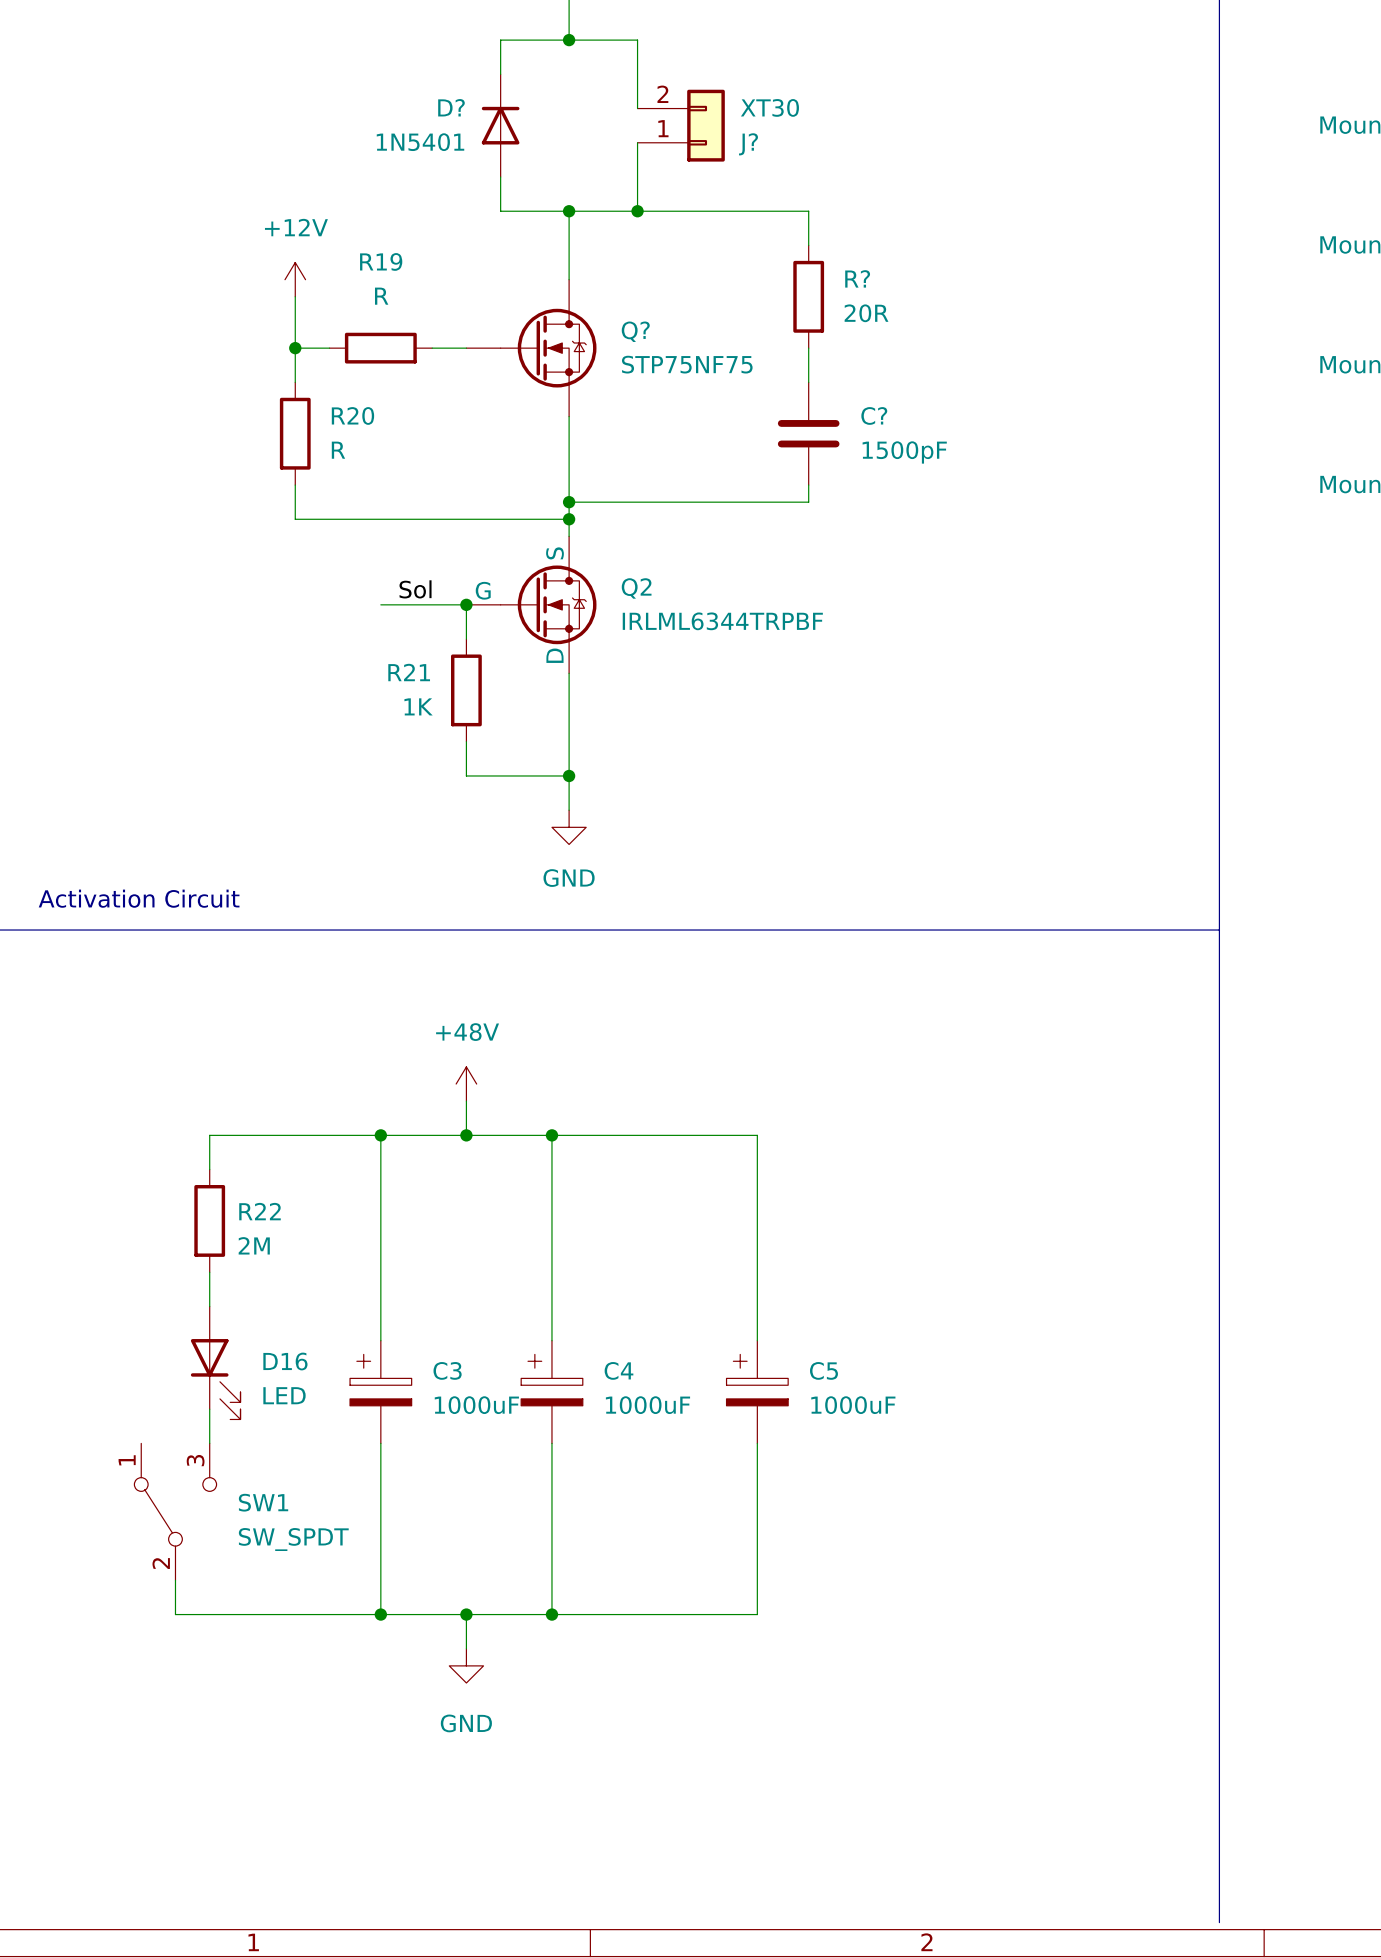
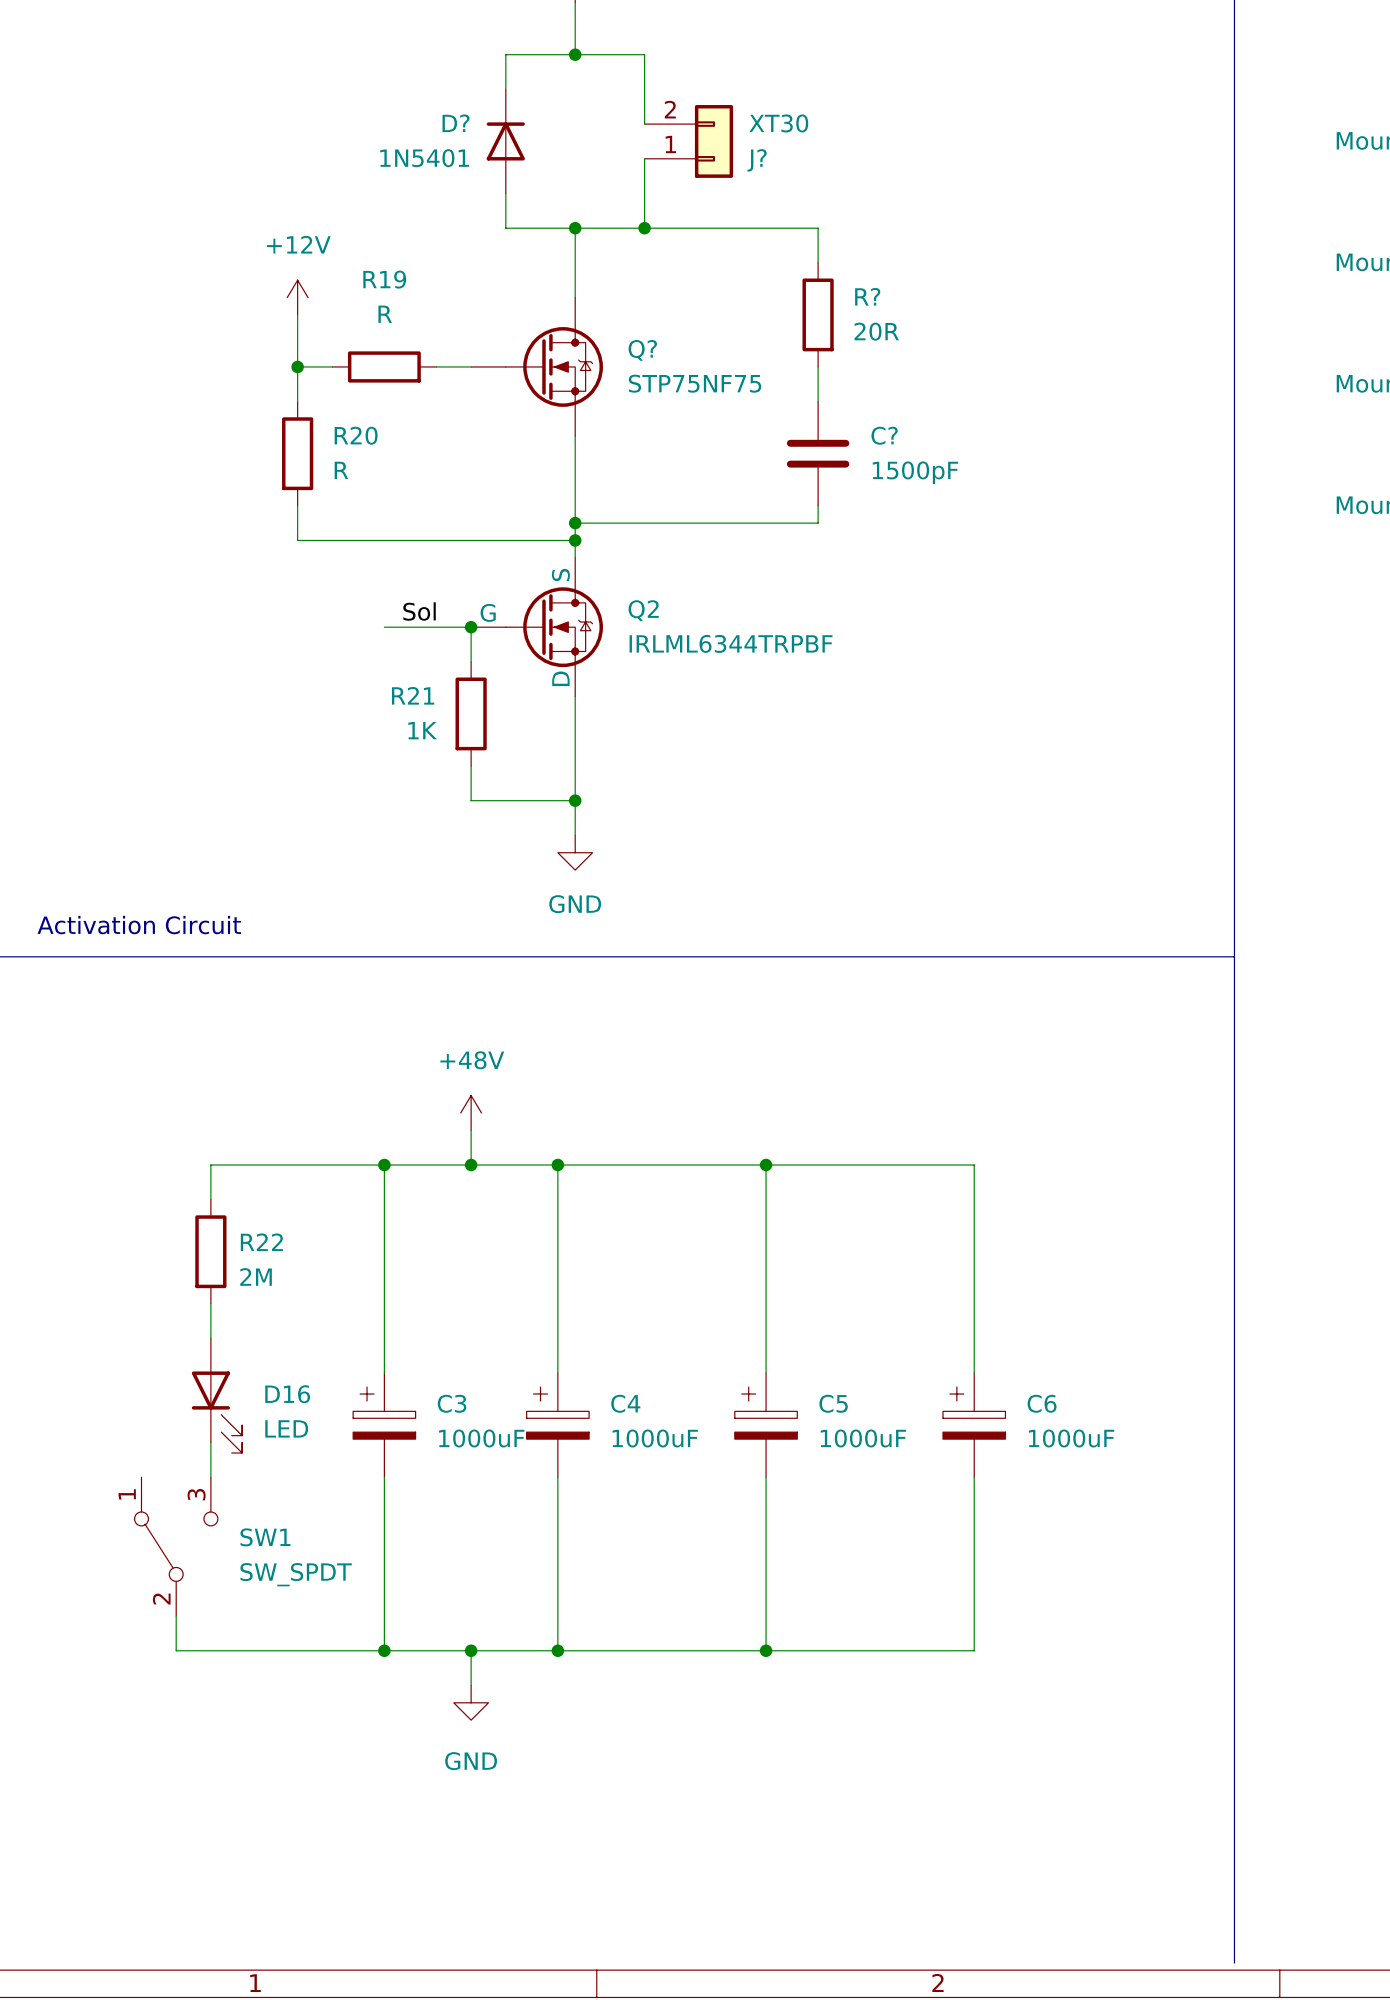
wire: none -> (766, 1165) (974, 1165) (974, 1373)
junction: none -> (766, 1165)
C6: none -> 1000uF (974, 1425)
wire: none -> (974, 1477) (974, 1650) (766, 1650)
junction: none -> (766, 1650)

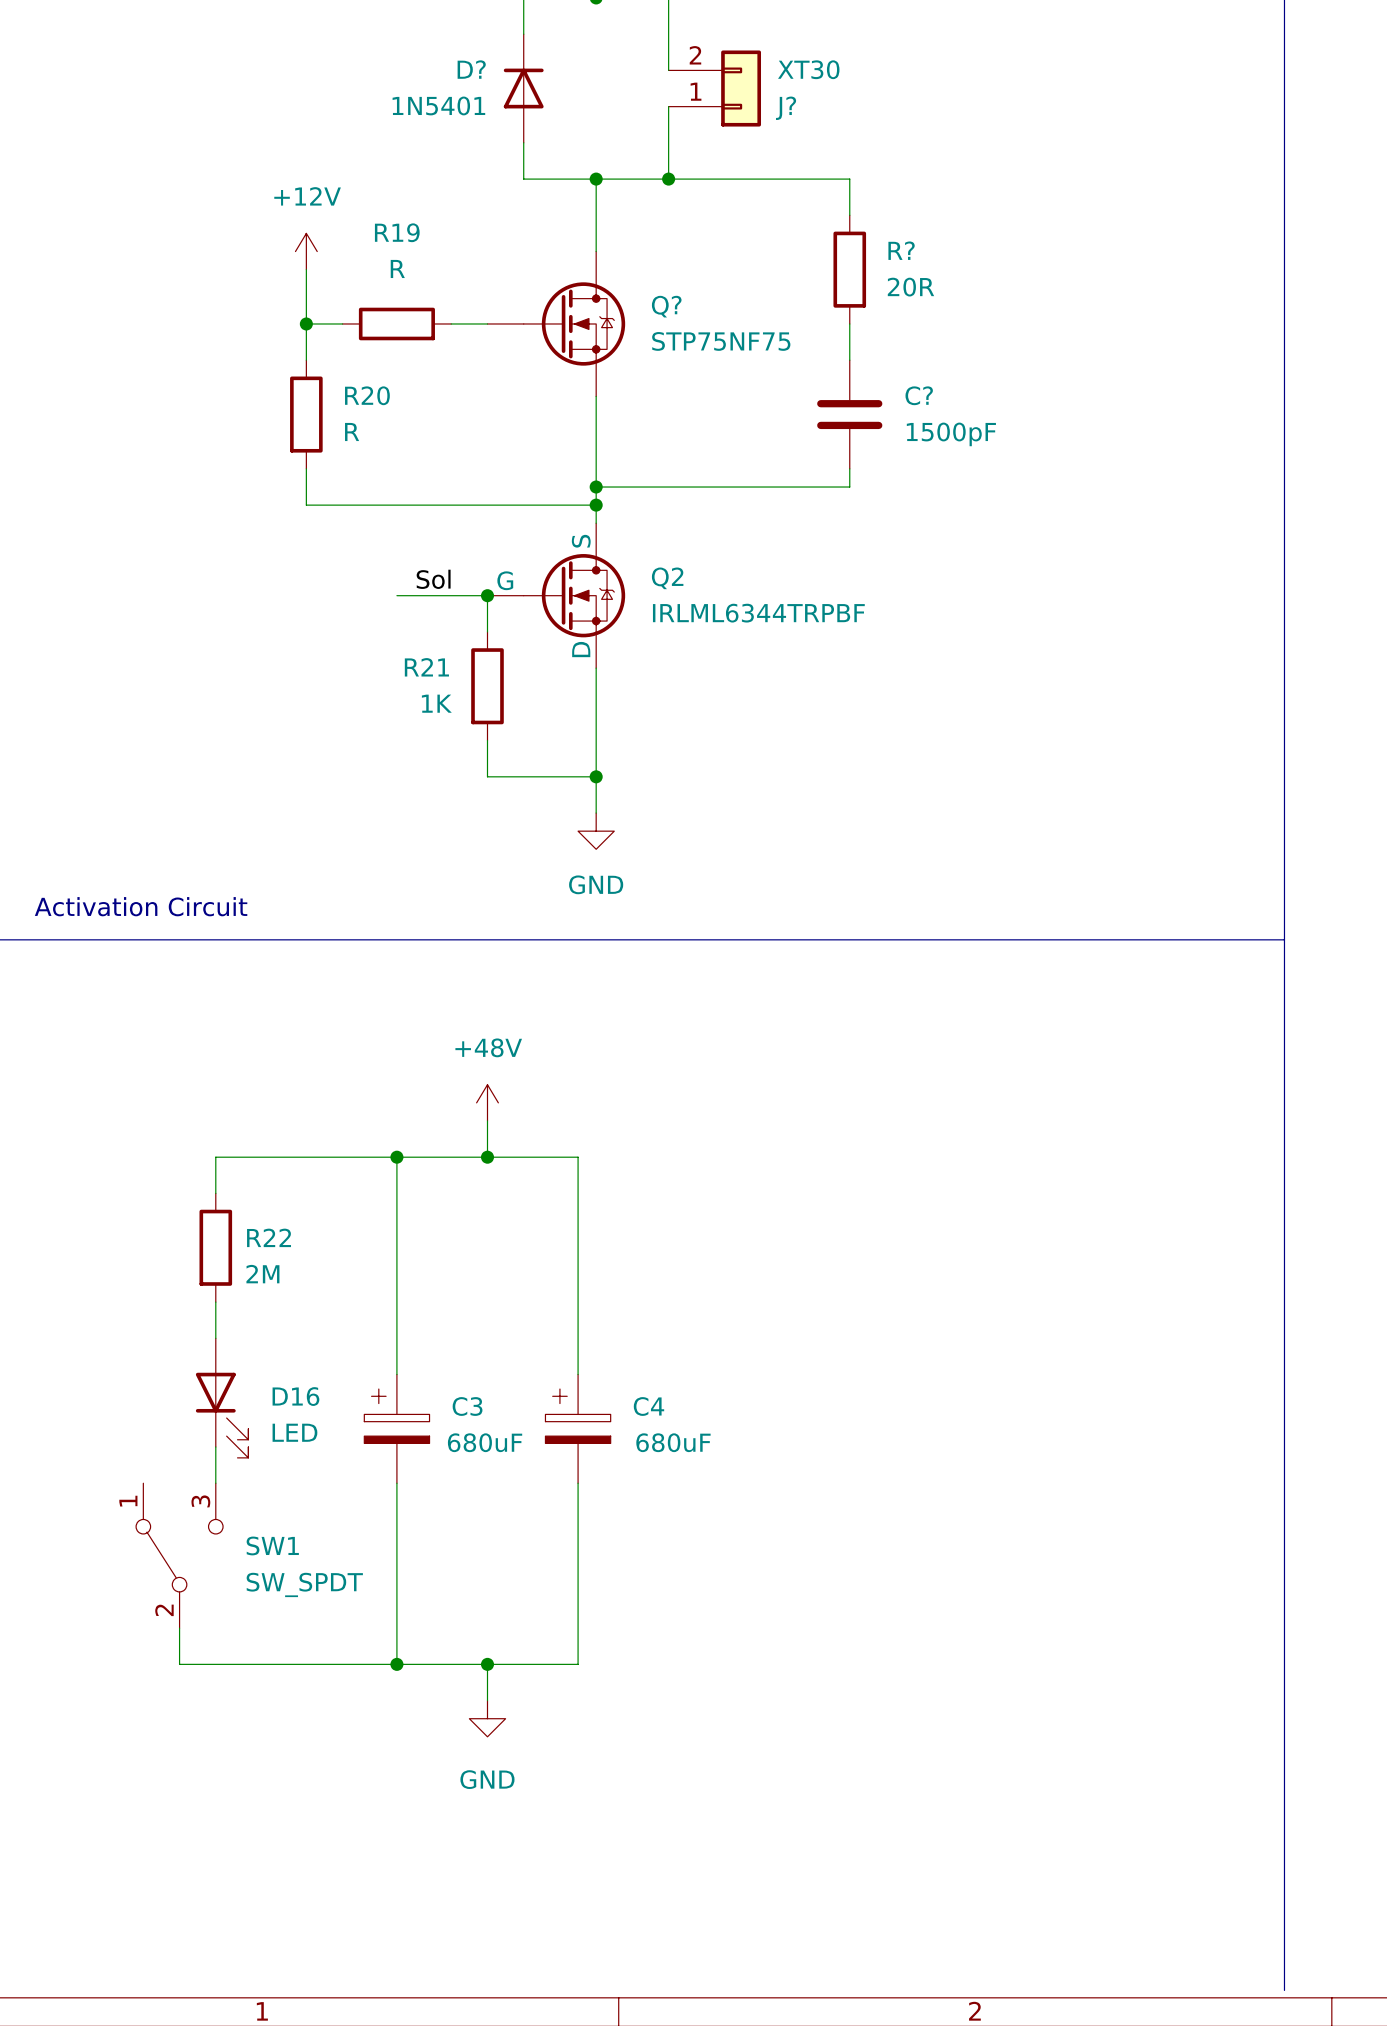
wire: (557, 1165) (974, 1165) (974, 1373) -> none
junction: (557, 1165) -> none
wire: (766, 1165) (766, 1373) -> none
junction: (766, 1165) -> none
C5: 1000uF (766, 1425) -> none
C6: 1000uF (974, 1425) -> none
C3 value: 1000uF (481, 1438) -> 680uF (485, 1442)
C4 value: 1000uF (655, 1438) -> 680uF (673, 1442)
wire: (766, 1477) (766, 1650) -> none
wire: (974, 1477) (974, 1650) (557, 1650) -> none
junction: (557, 1650) -> none
junction: (766, 1650) -> none

